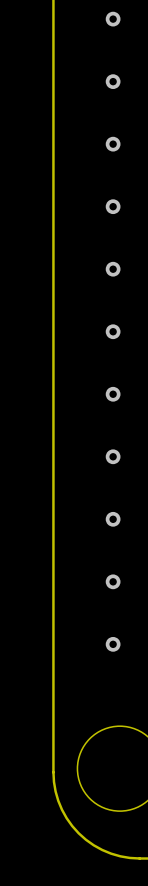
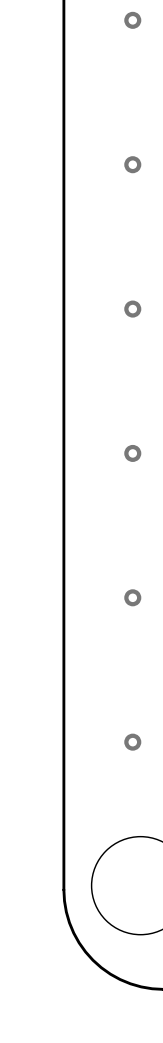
via: (113, 81) -> none
via: (113, 206) -> none
via: (113, 331) -> none
via: (113, 456) -> none
via: (113, 581) -> none

